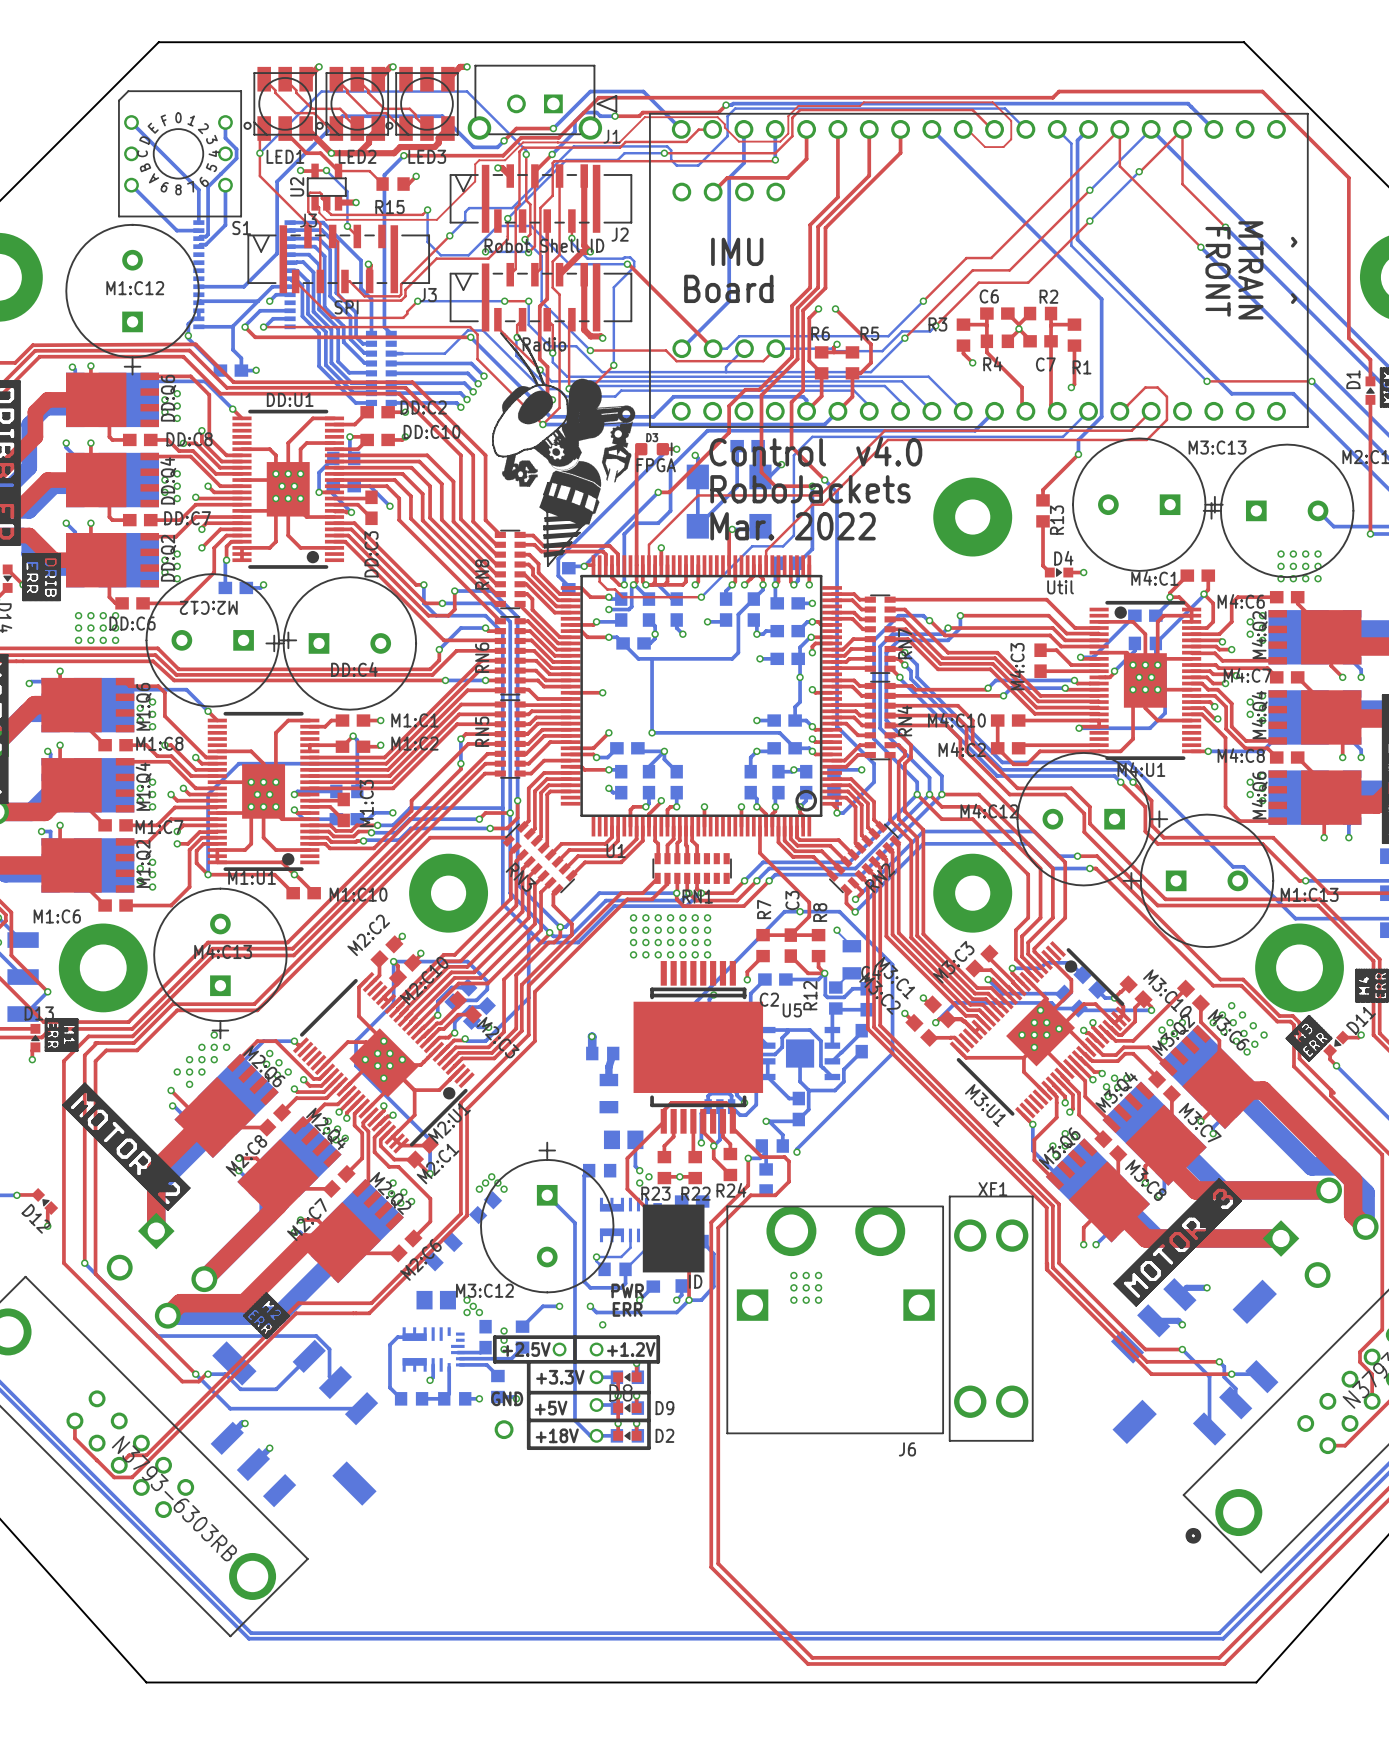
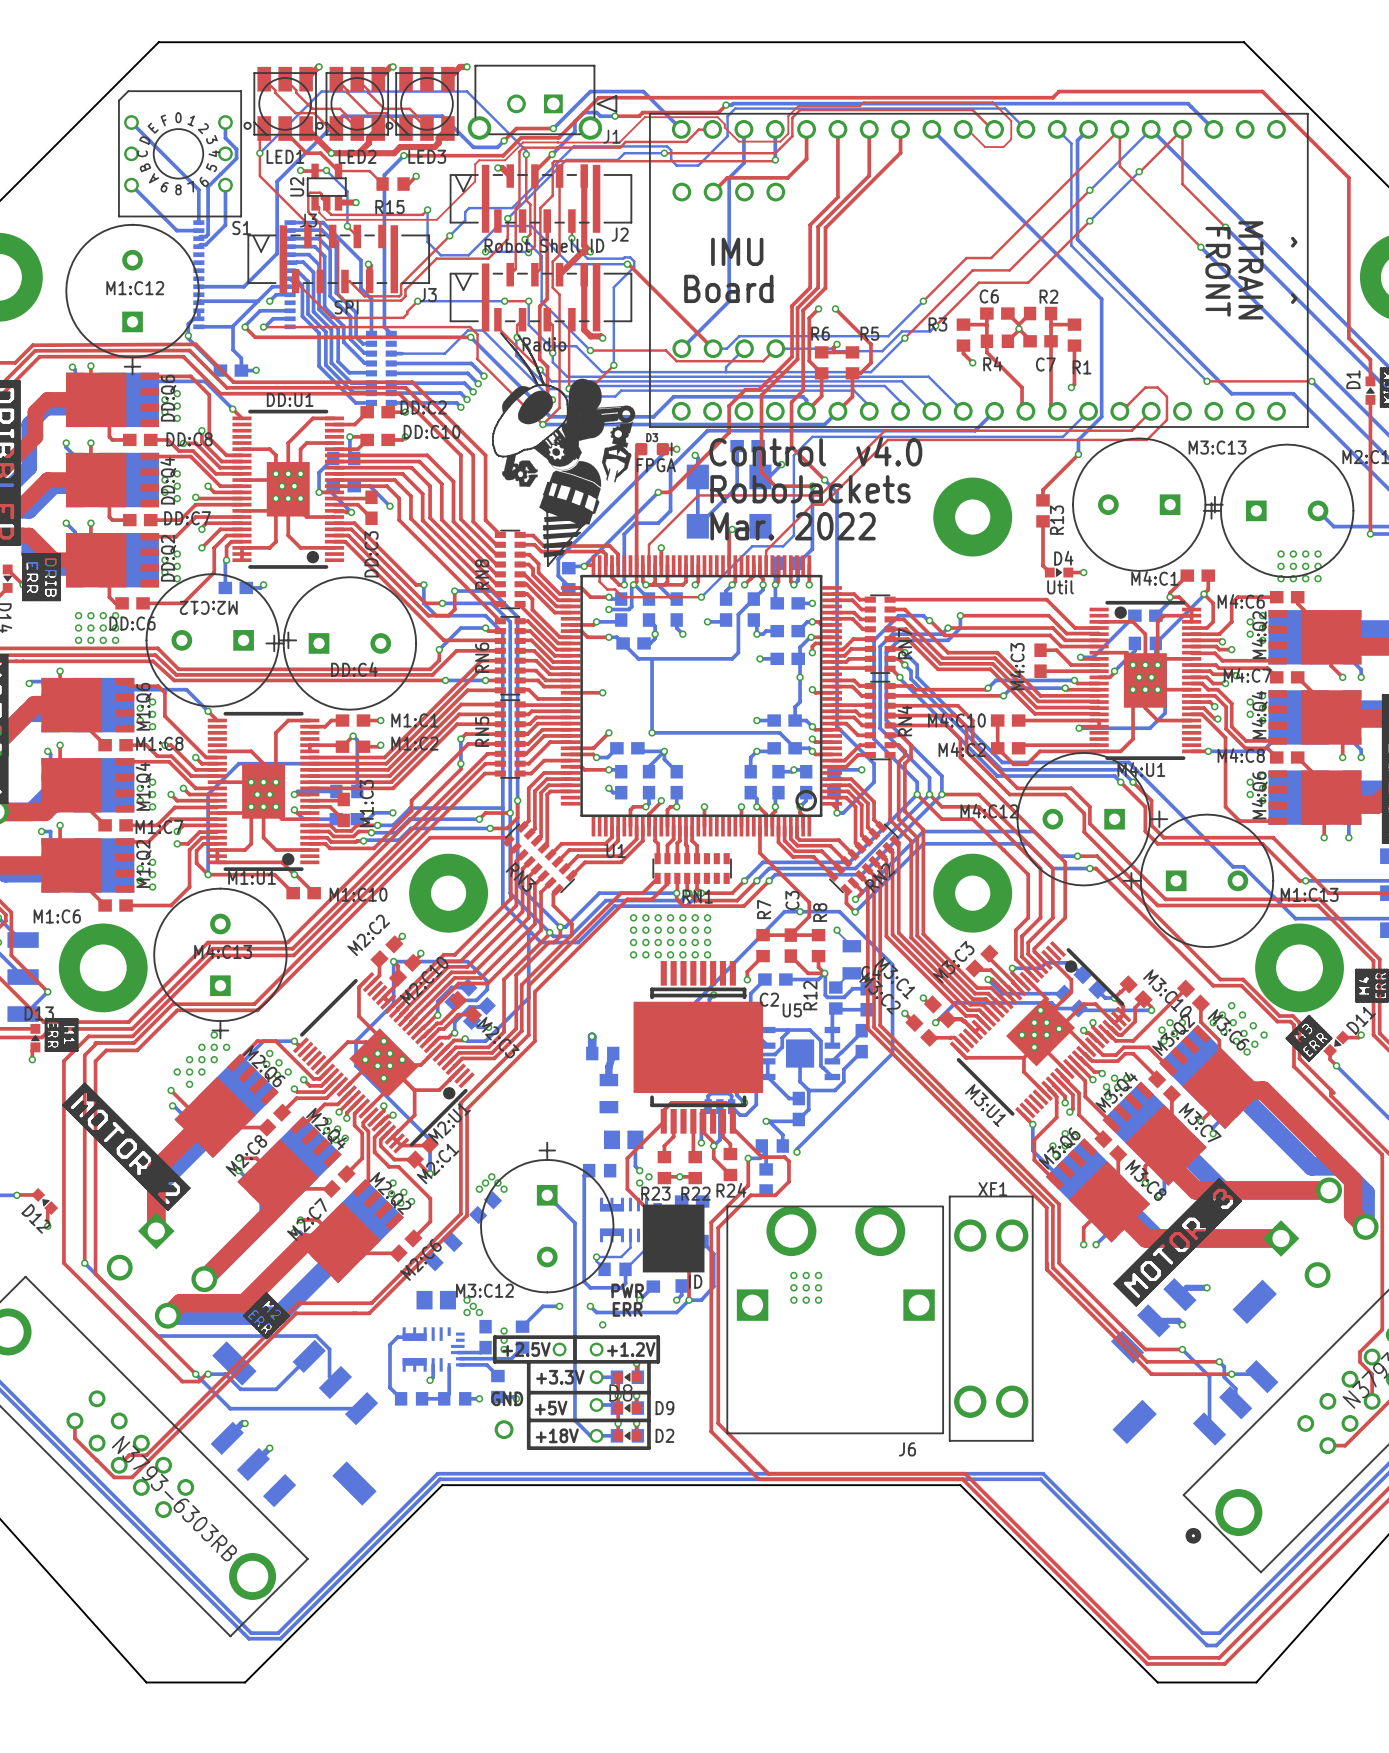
top track: (718, 1423) (718, 1563) (812, 1657) (1149, 1657) -> (718, 1423) (768, 1473) (965, 1473) (1149, 1657)
top track: (711, 1431) (711, 1567) (807, 1663) (1147, 1663) -> (711, 1431) (758, 1479) (962, 1479) (1147, 1663)
bottom track: (278, 1633) (1202, 1633) -> (278, 1633) (437, 1473) (1043, 1473) (1202, 1633)
bottom track: (280, 1638) (1223, 1638) -> (280, 1638) (439, 1479) (1040, 1479) (1207, 1645) (1216, 1645) (1223, 1638)
board edge: (245, 1682) (1157, 1682) -> (245, 1682) (442, 1485) (960, 1485) (1157, 1682)

